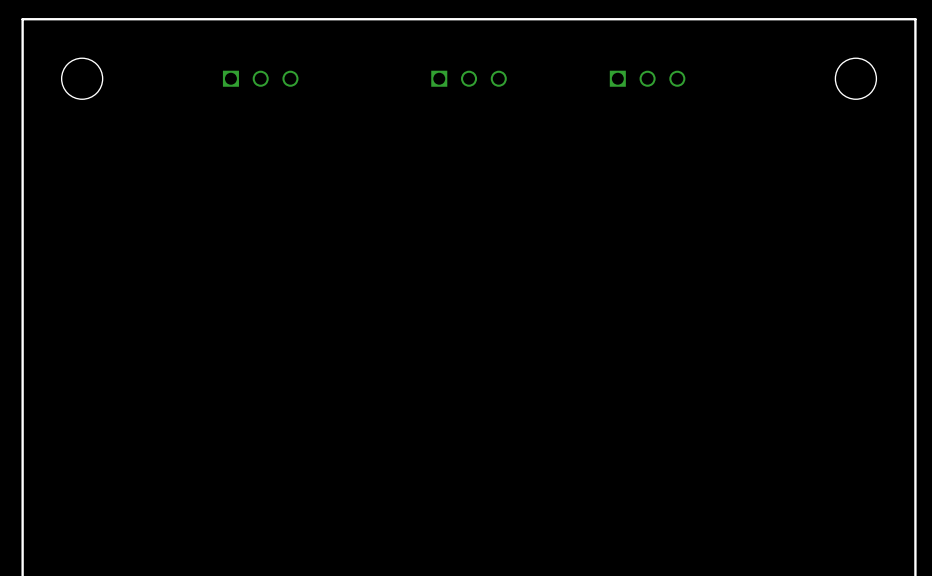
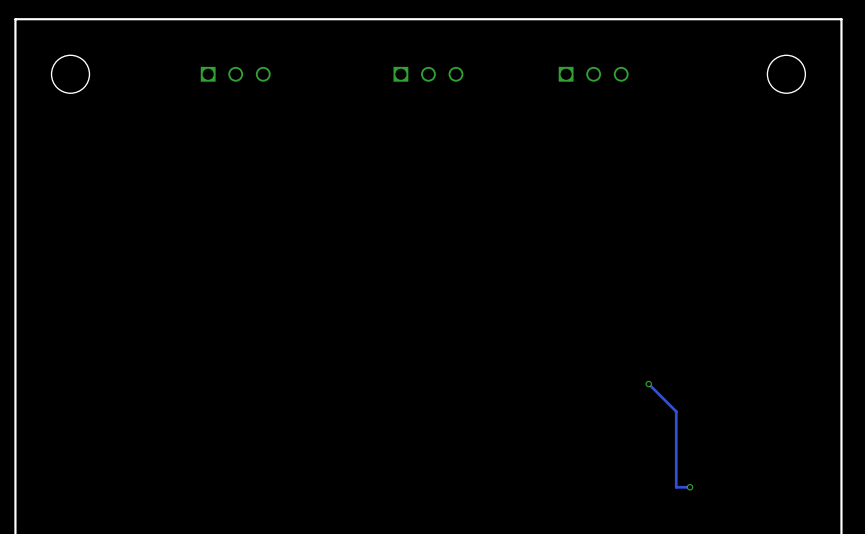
track: none -> (648, 384) (676, 411) (676, 487) (690, 487)
via: none -> (648, 384)
via: none -> (690, 487)

